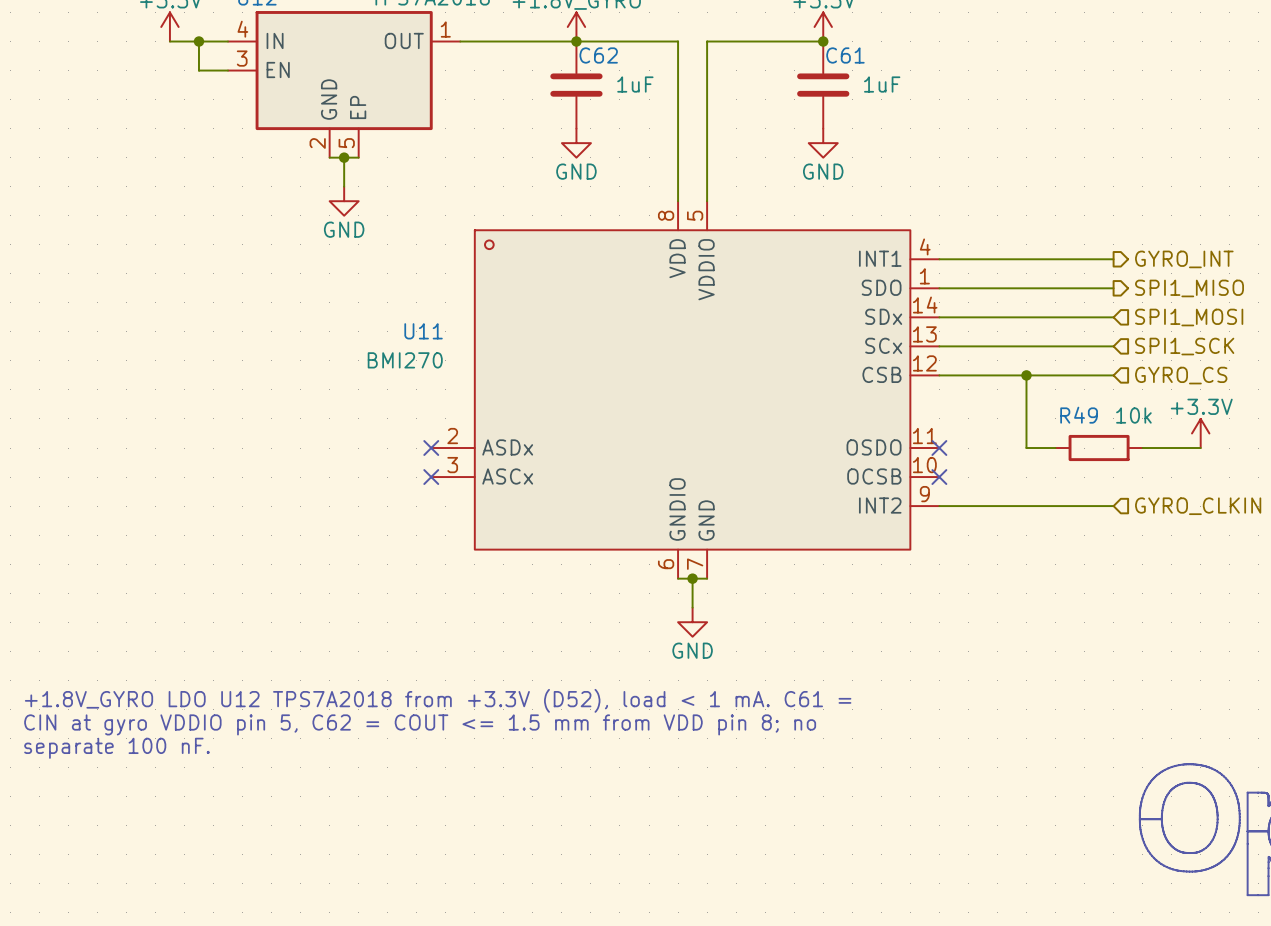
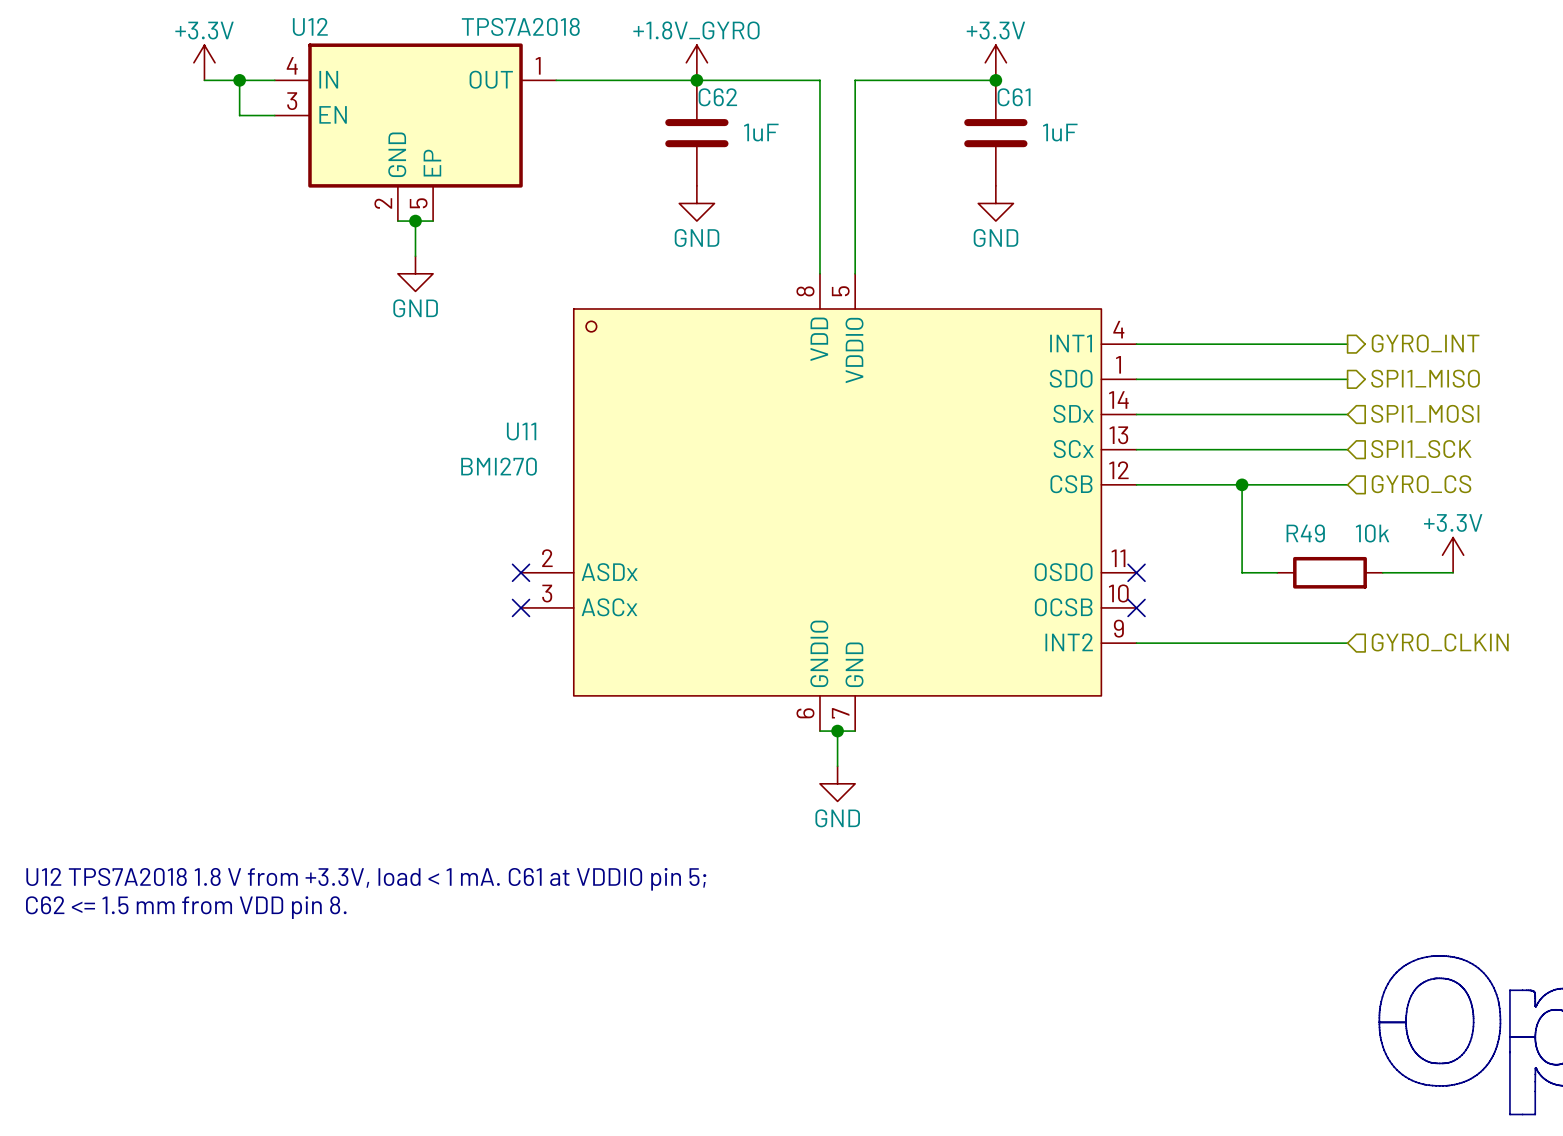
text: +1.8V_GYRO LDO U12 TPS7A2018 from +3.3V (D52), load < 1 mA. C61 = (438, 700) -> U12 TPS7A2018 1.8 V from +3.3V, load < 1 mA. C61 at VDDIO pin 5; (366, 879)
text: CIN at gyro VDDIO pin 5, C62 = COUT <= 1.5 mm from VDD pin 8; no (420, 724) -> C62 <= 1.5 mm from VDD pin 8. (186, 907)
text: separate 100 nF. (117, 748) -> none

